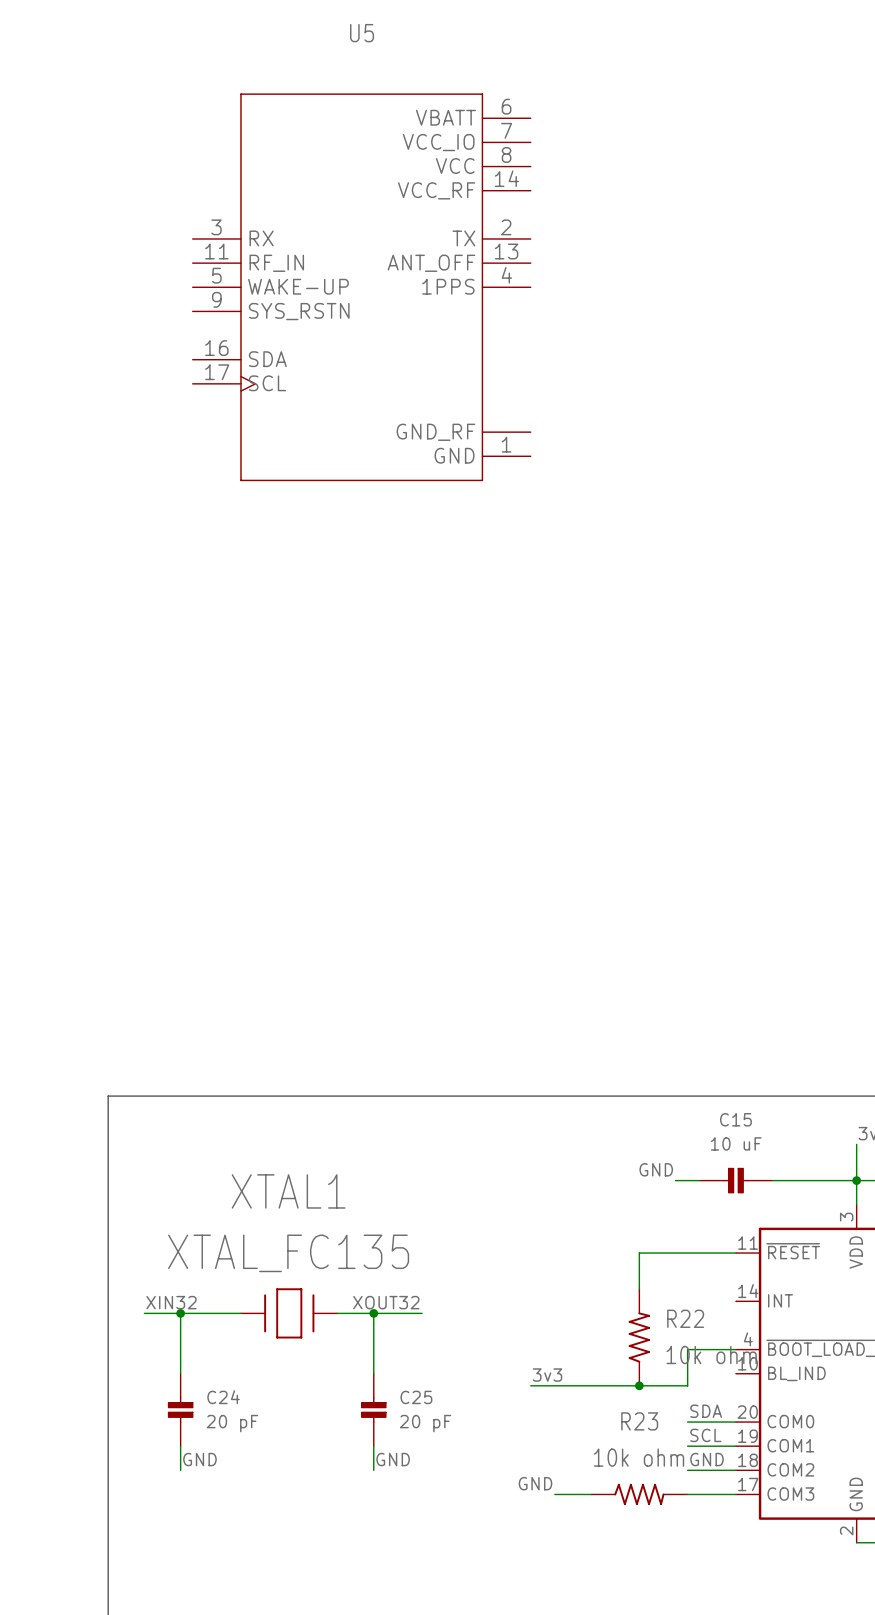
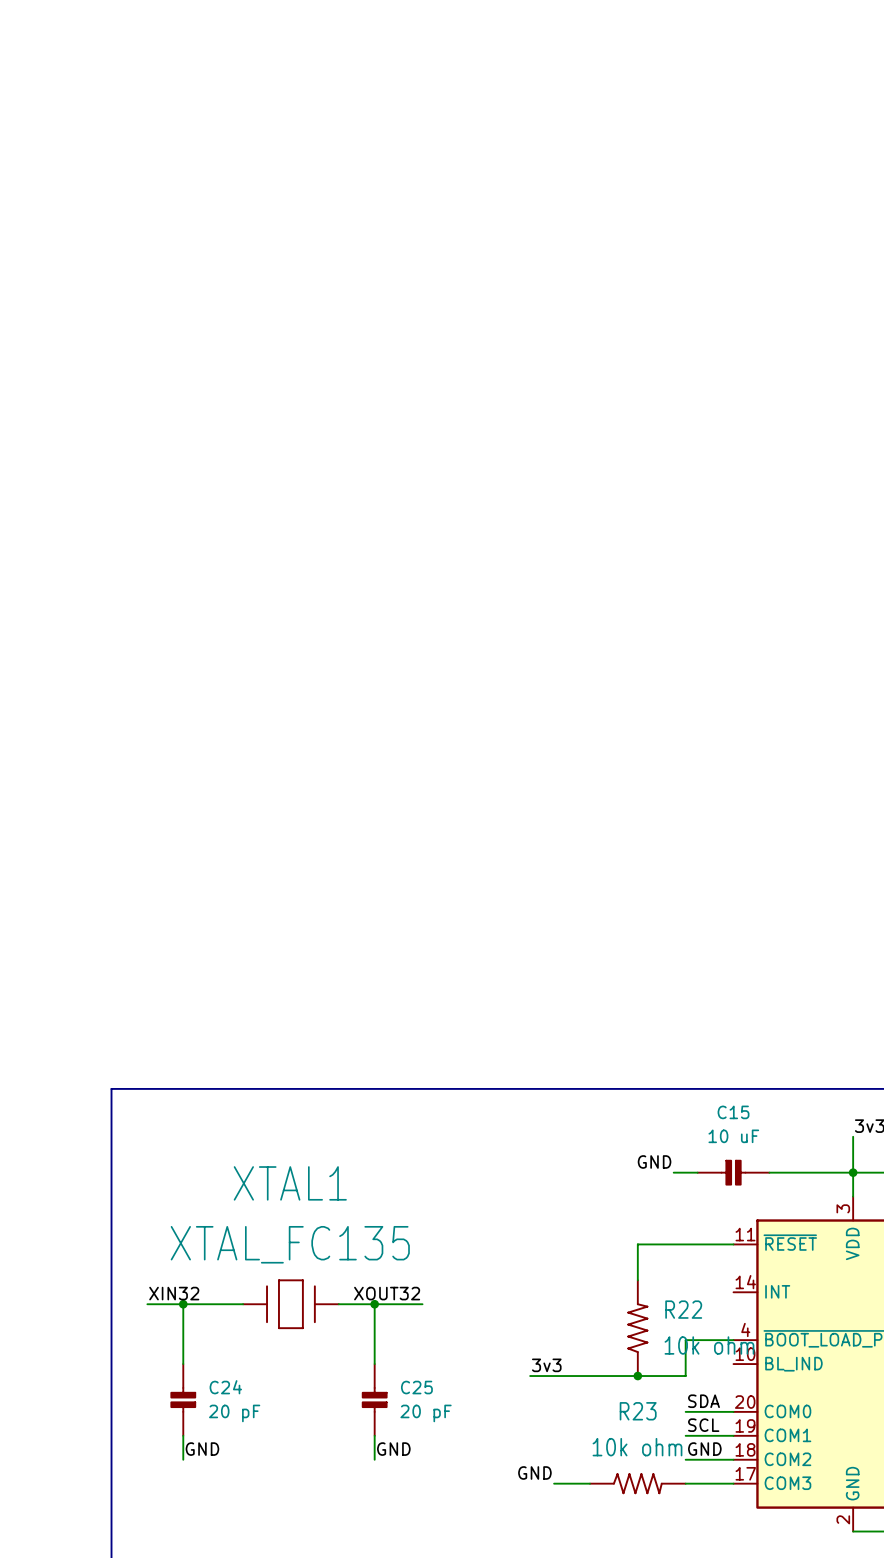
U5: (361, 287) -> none

